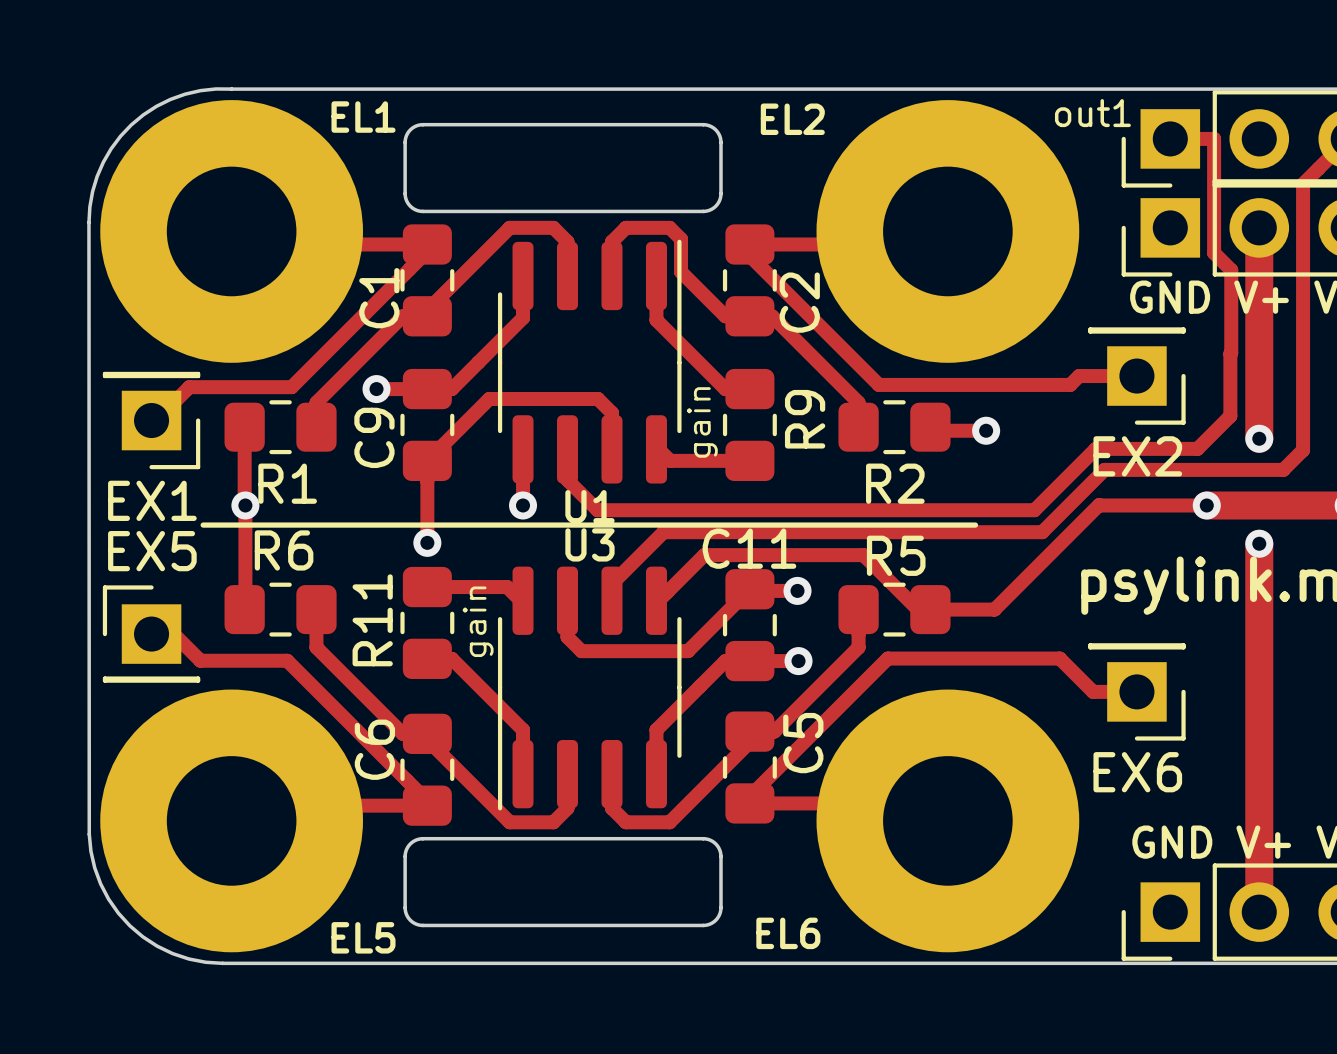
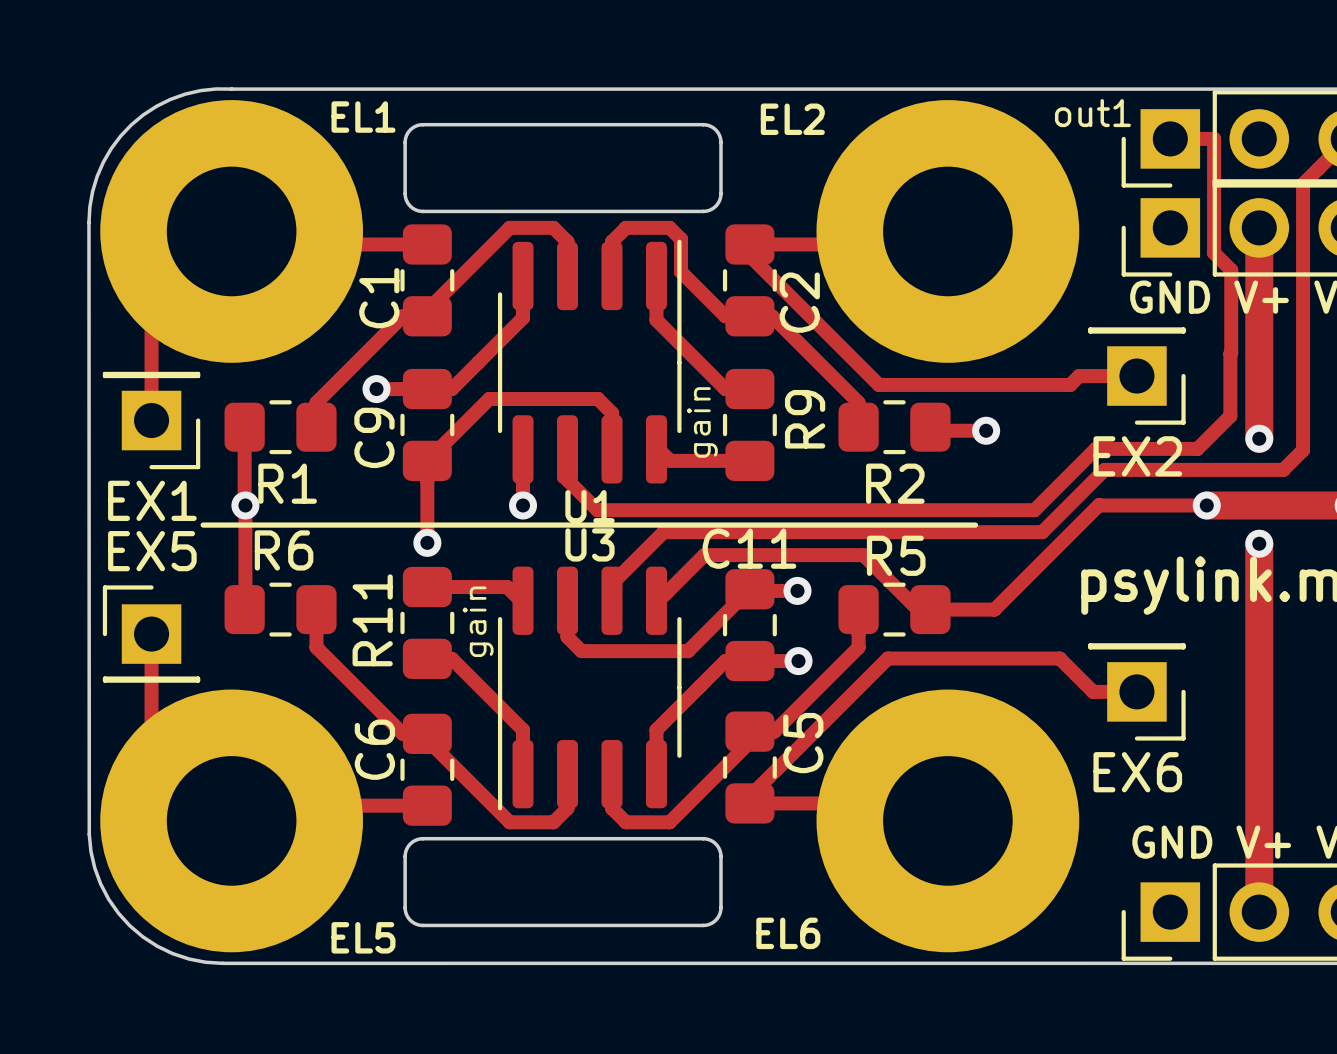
track: (431, 247) (291, 387) (189, 387) (155, 420) (151, 420) -> (151, 311) (151, 420)
track: (151, 634) (173, 634) (200, 660) (287, 660) (427, 800) -> (151, 634) (151, 740)

